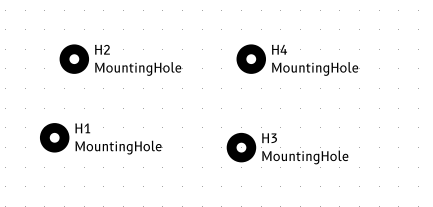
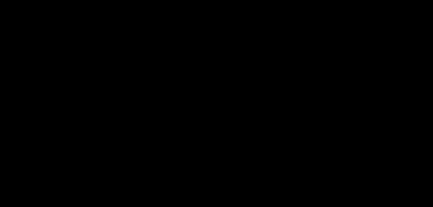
H2: MountingHole (74, 59) -> none
H4: MountingHole (251, 59) -> none
H1: MountingHole (54, 137) -> none
H3: MountingHole (241, 147) -> none

